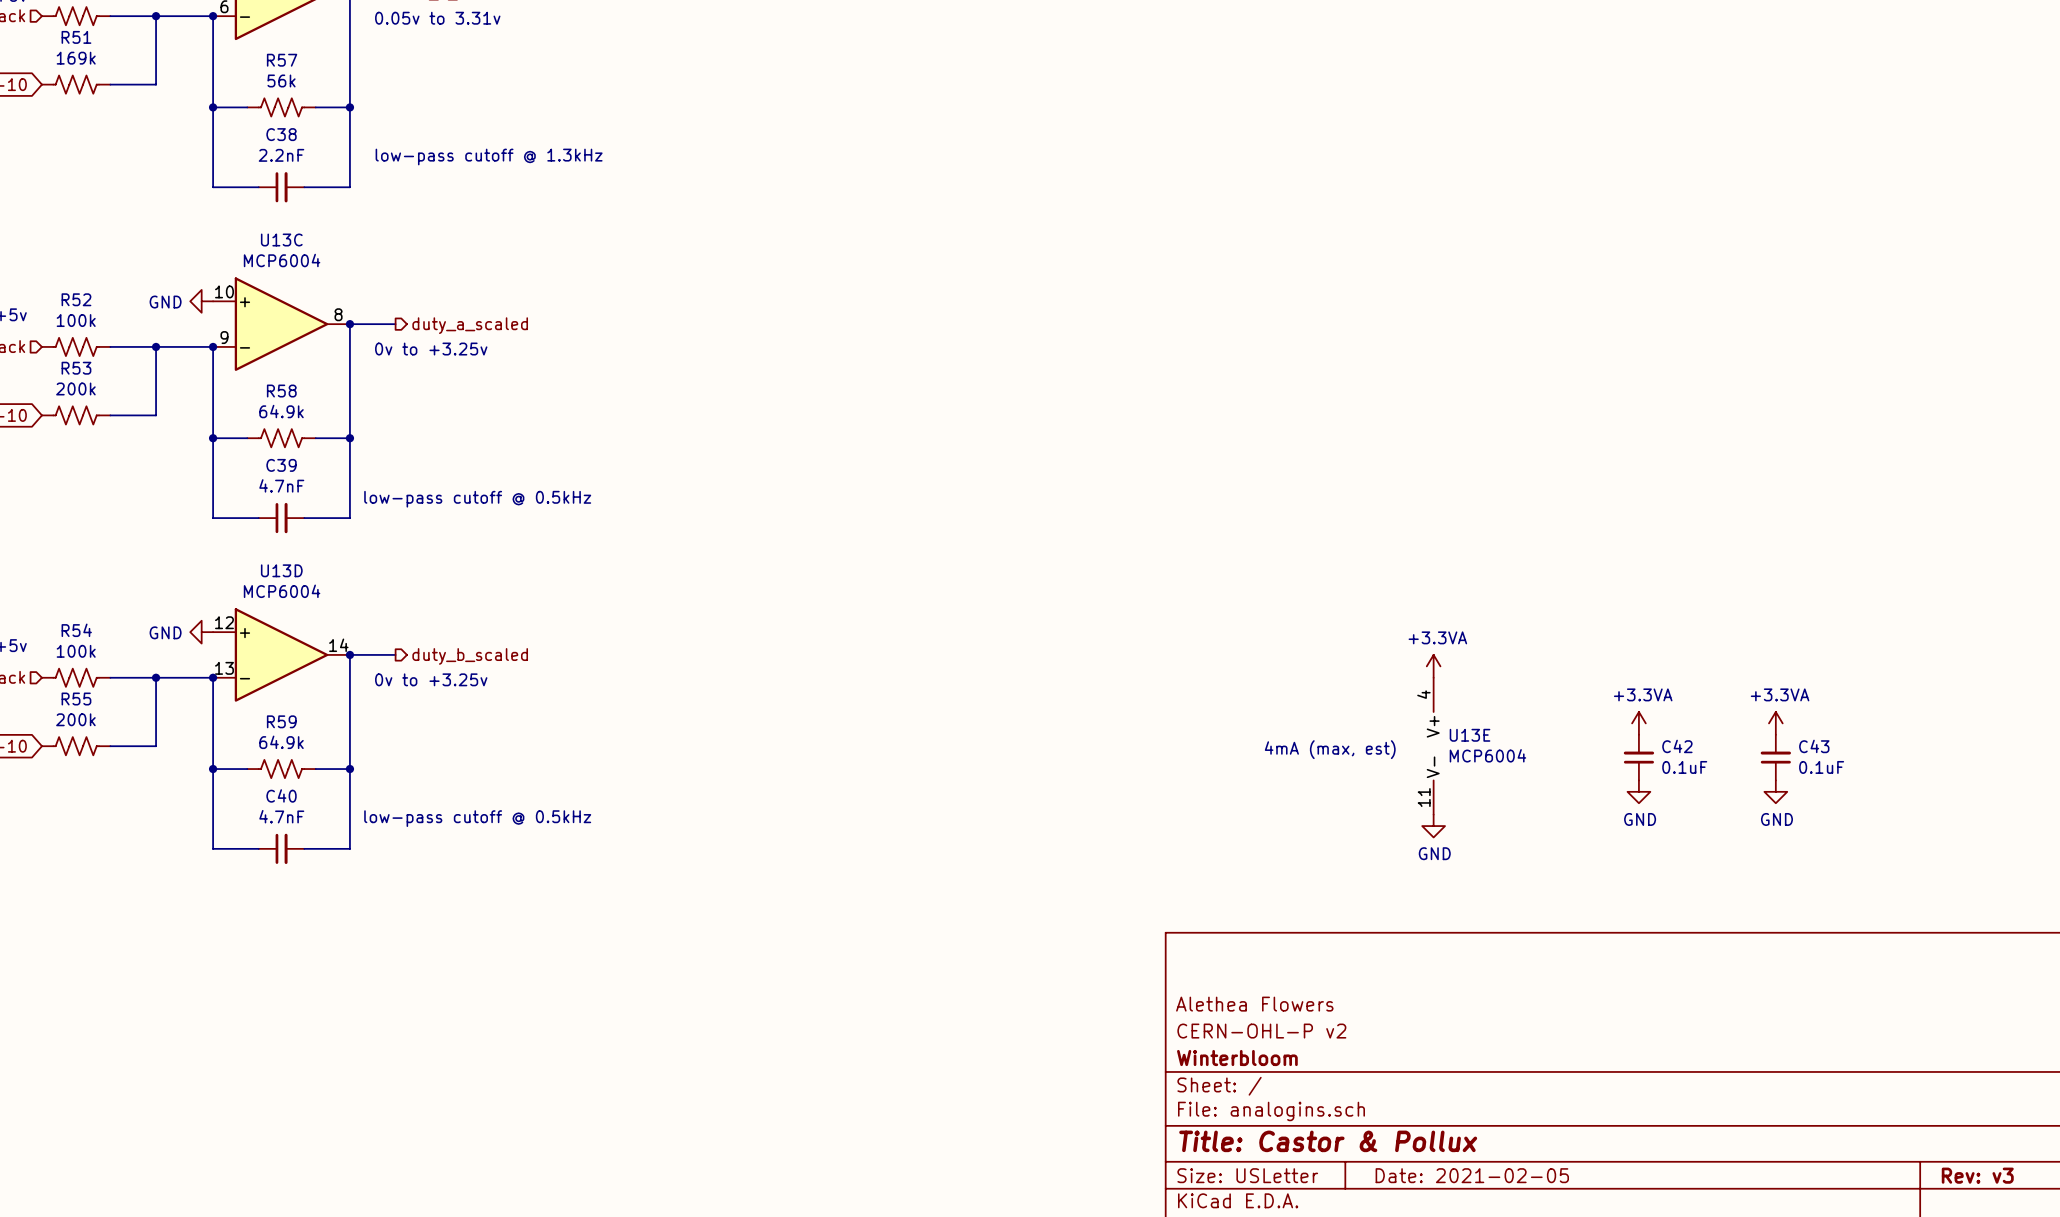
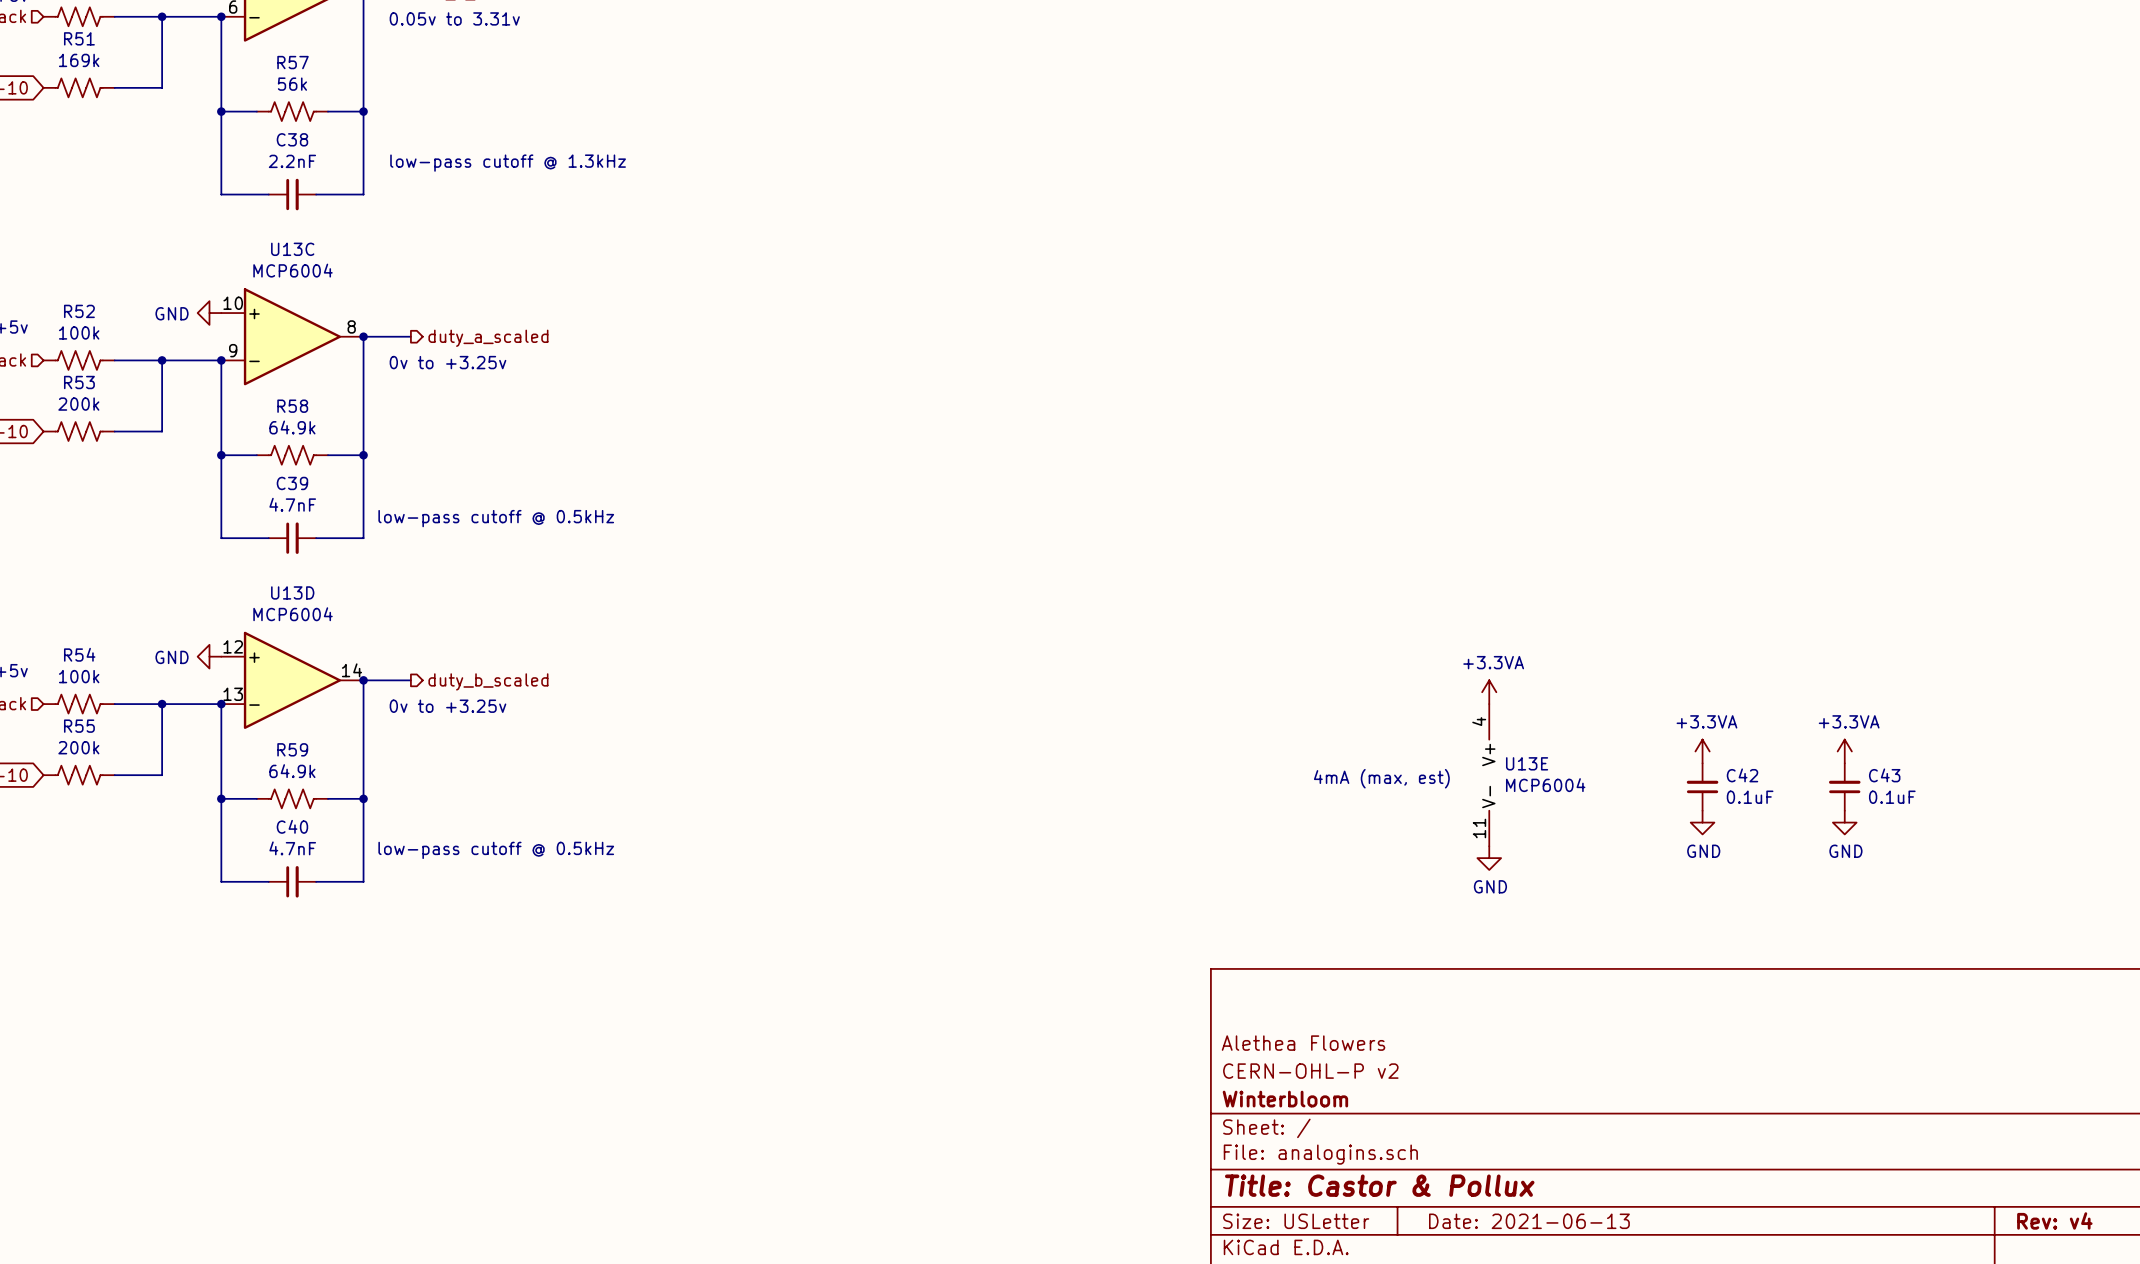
title block: Date: 2021-02-05 (1472, 1175) -> Date: 2021-06-13 (1529, 1221)
title block: Rev: v3 (1977, 1175) -> Rev: v4 (2054, 1220)

